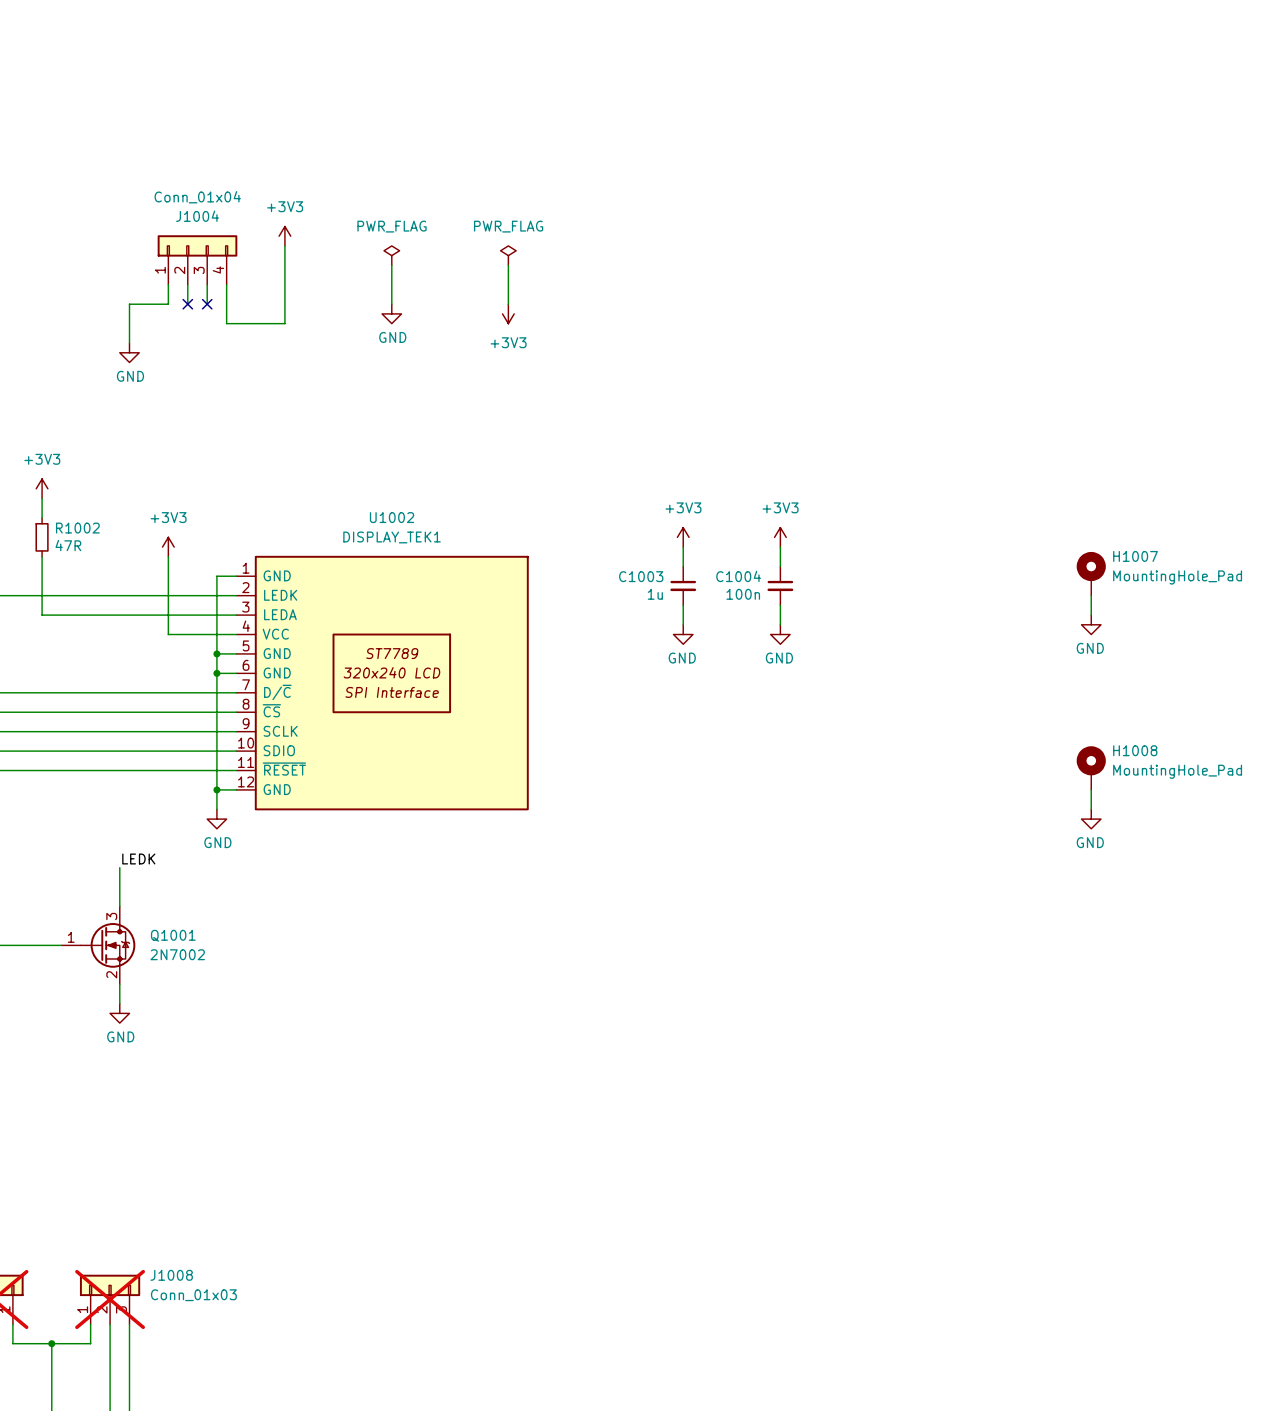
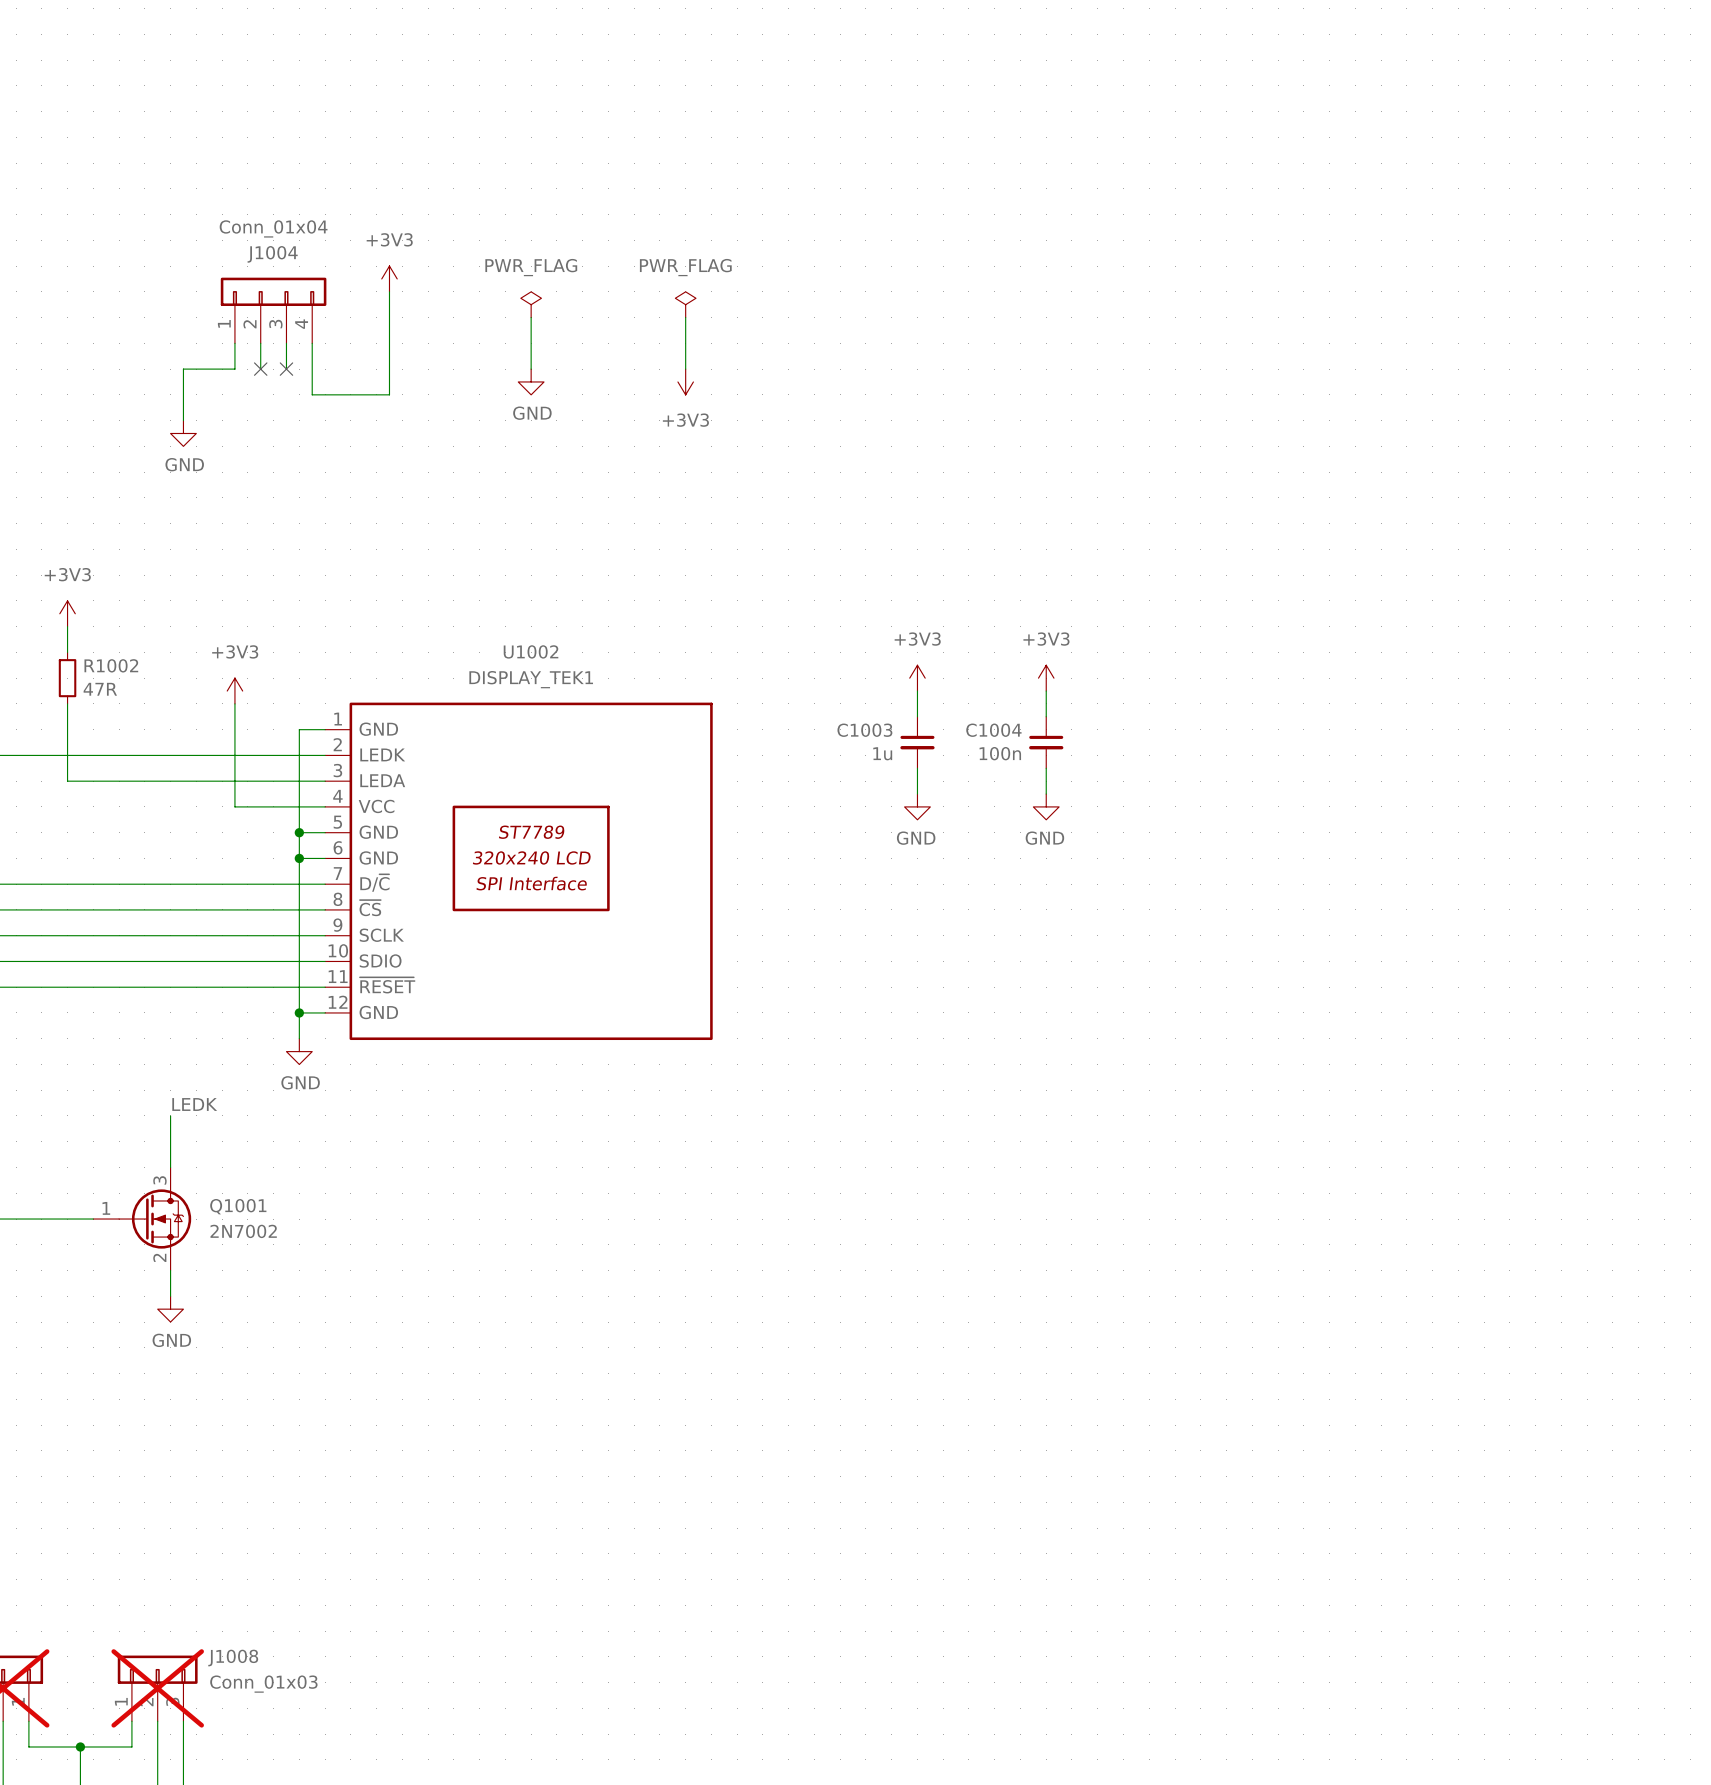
H1007: MountingHole_Pad (1091, 573) -> none
wire: (1091, 595) (1091, 615) -> none
power symbol: GND (1091, 624) -> none
H1008: MountingHole_Pad (1091, 768) -> none
wire: (1091, 789) (1091, 809) -> none
power symbol: GND (1091, 819) -> none

